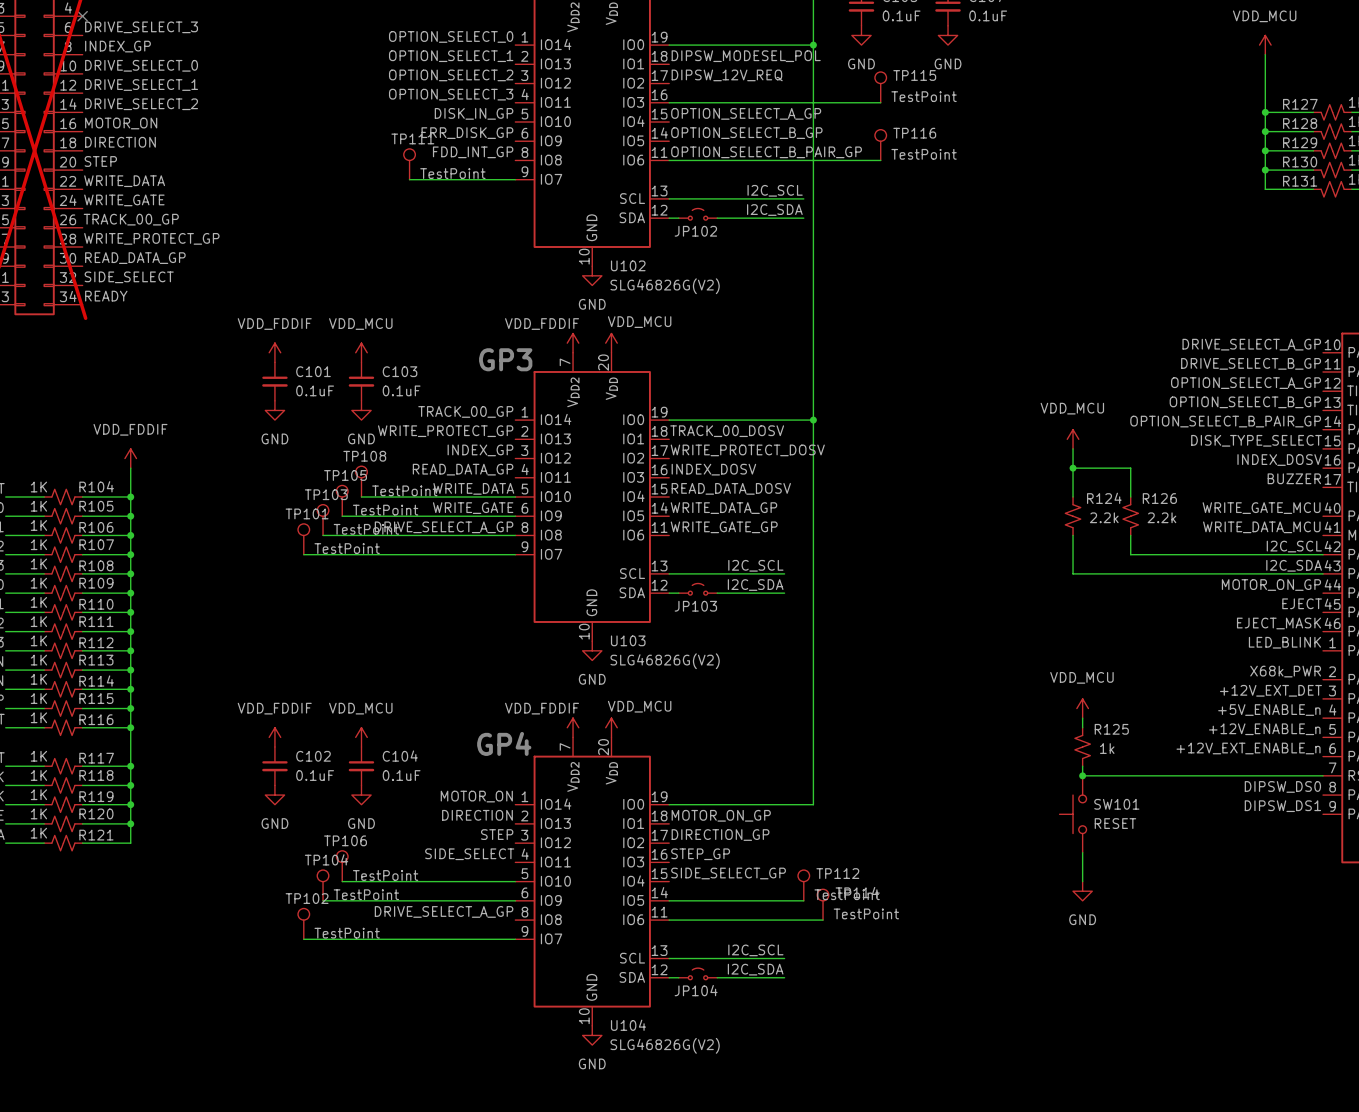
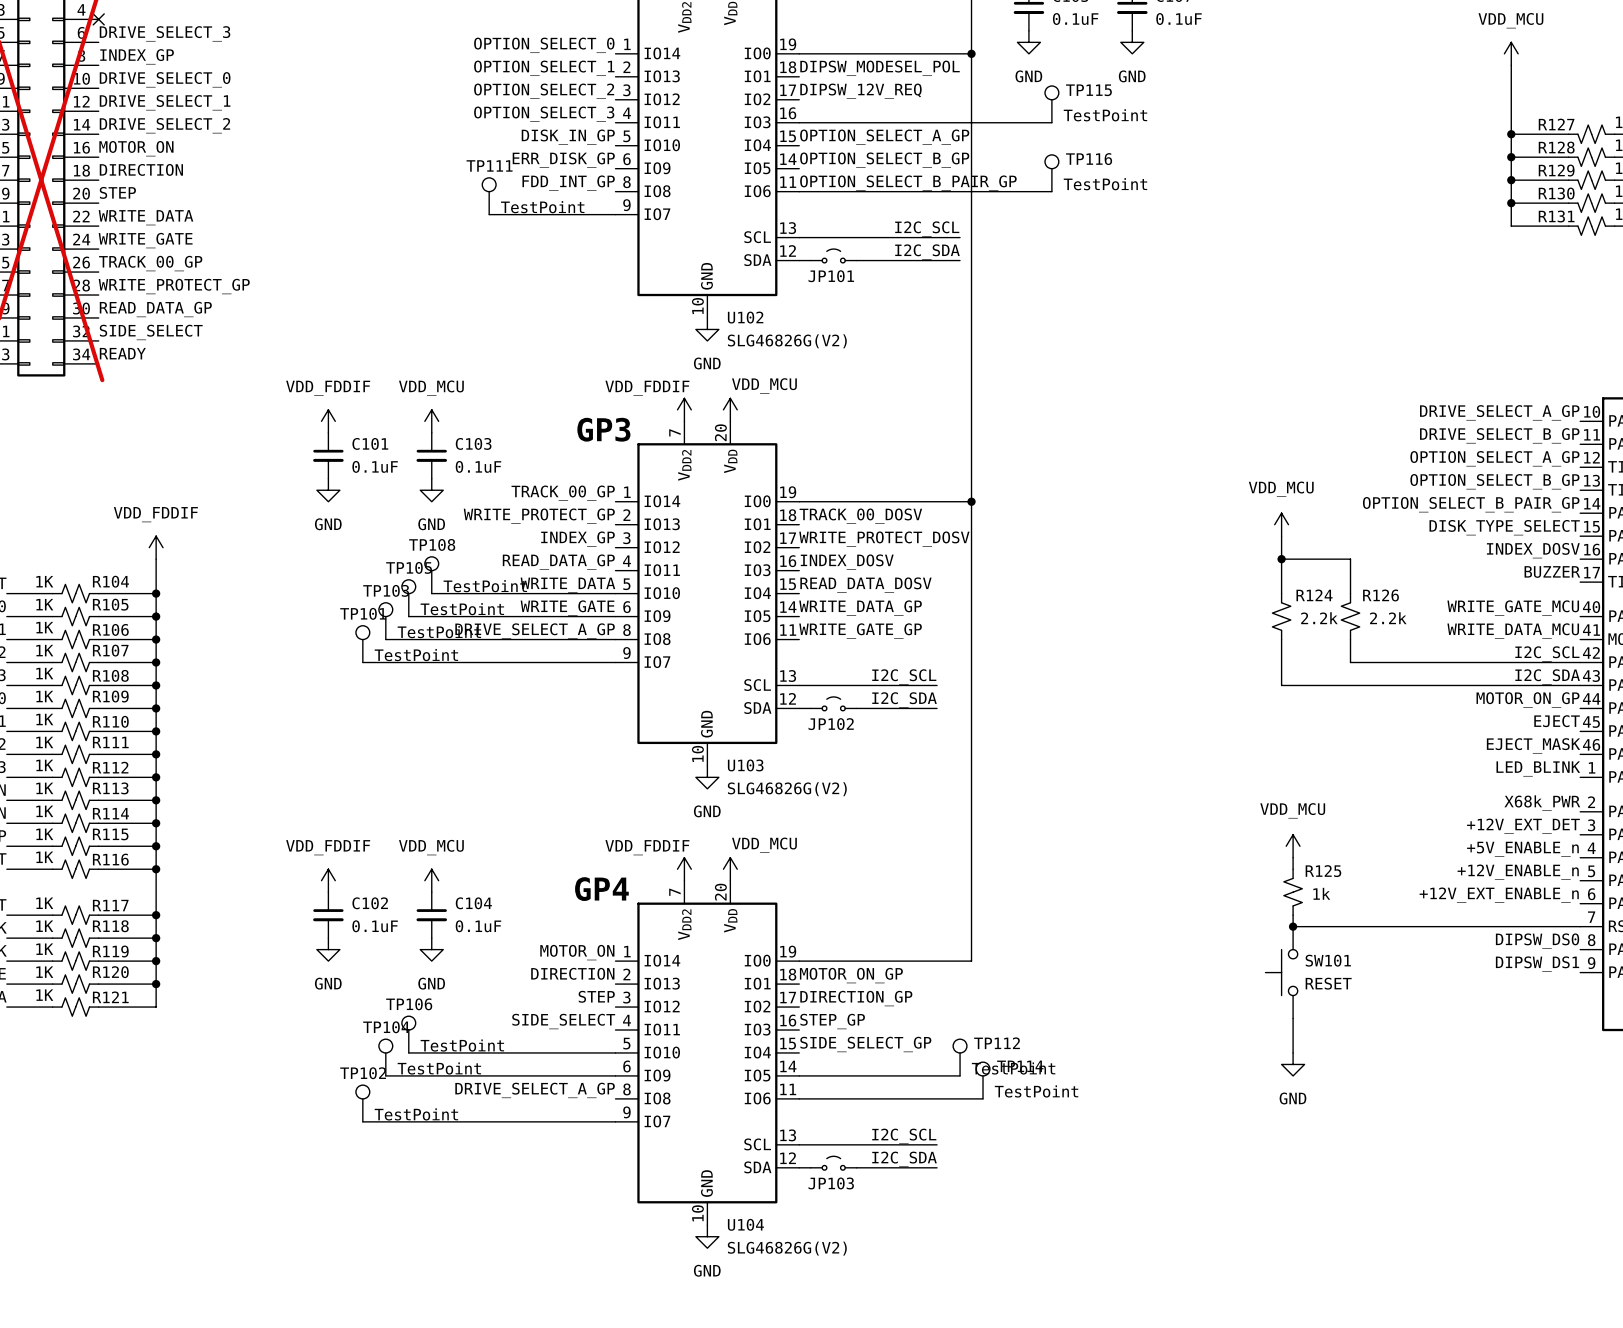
JP102 name: JP102 (695, 231) -> JP101 (831, 276)
JP103 name: JP103 (695, 606) -> JP102 (831, 724)
JP104 name: JP104 (696, 990) -> JP103 (831, 1183)

